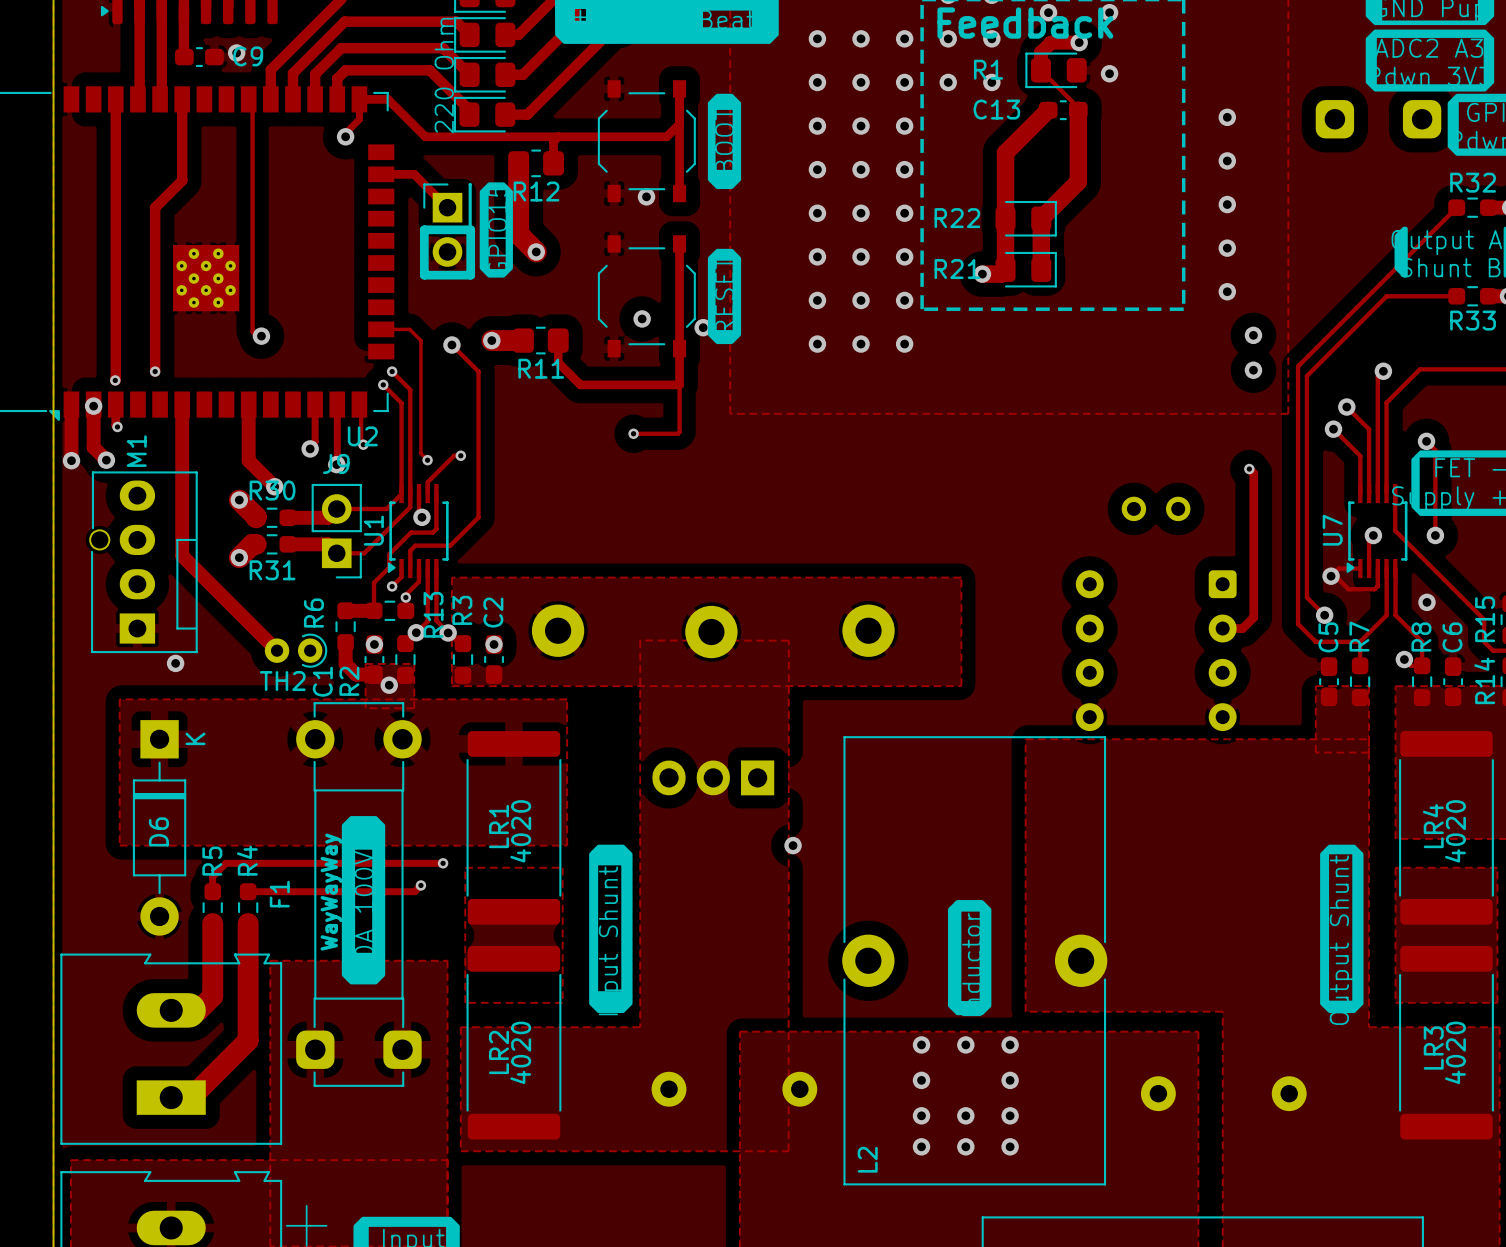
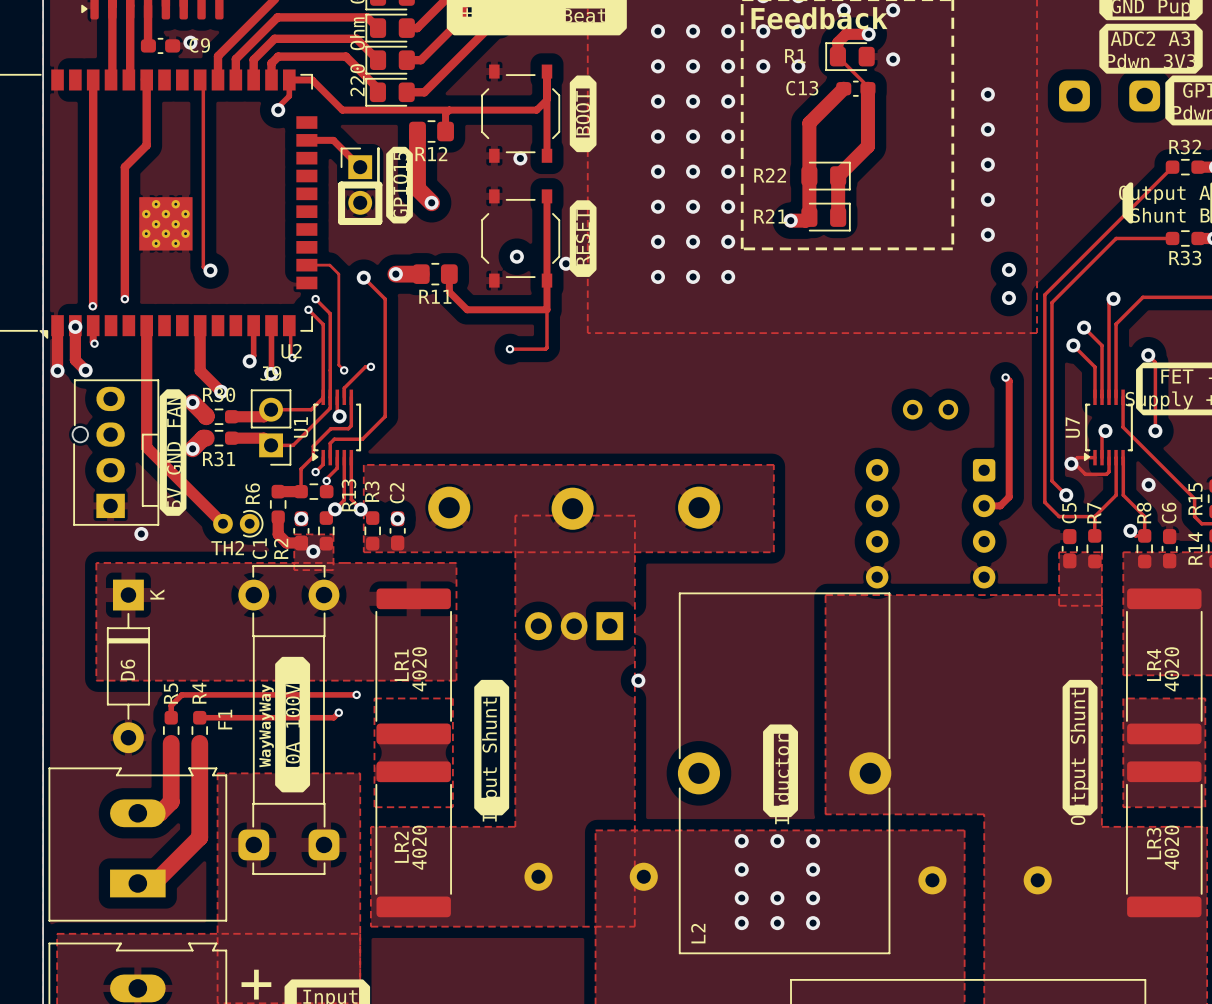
M1 name: M1 (136, 451) -> none
drawing: none -> [159, 389, 187, 516]
text: none -> 5V GND FAN (174, 452)

